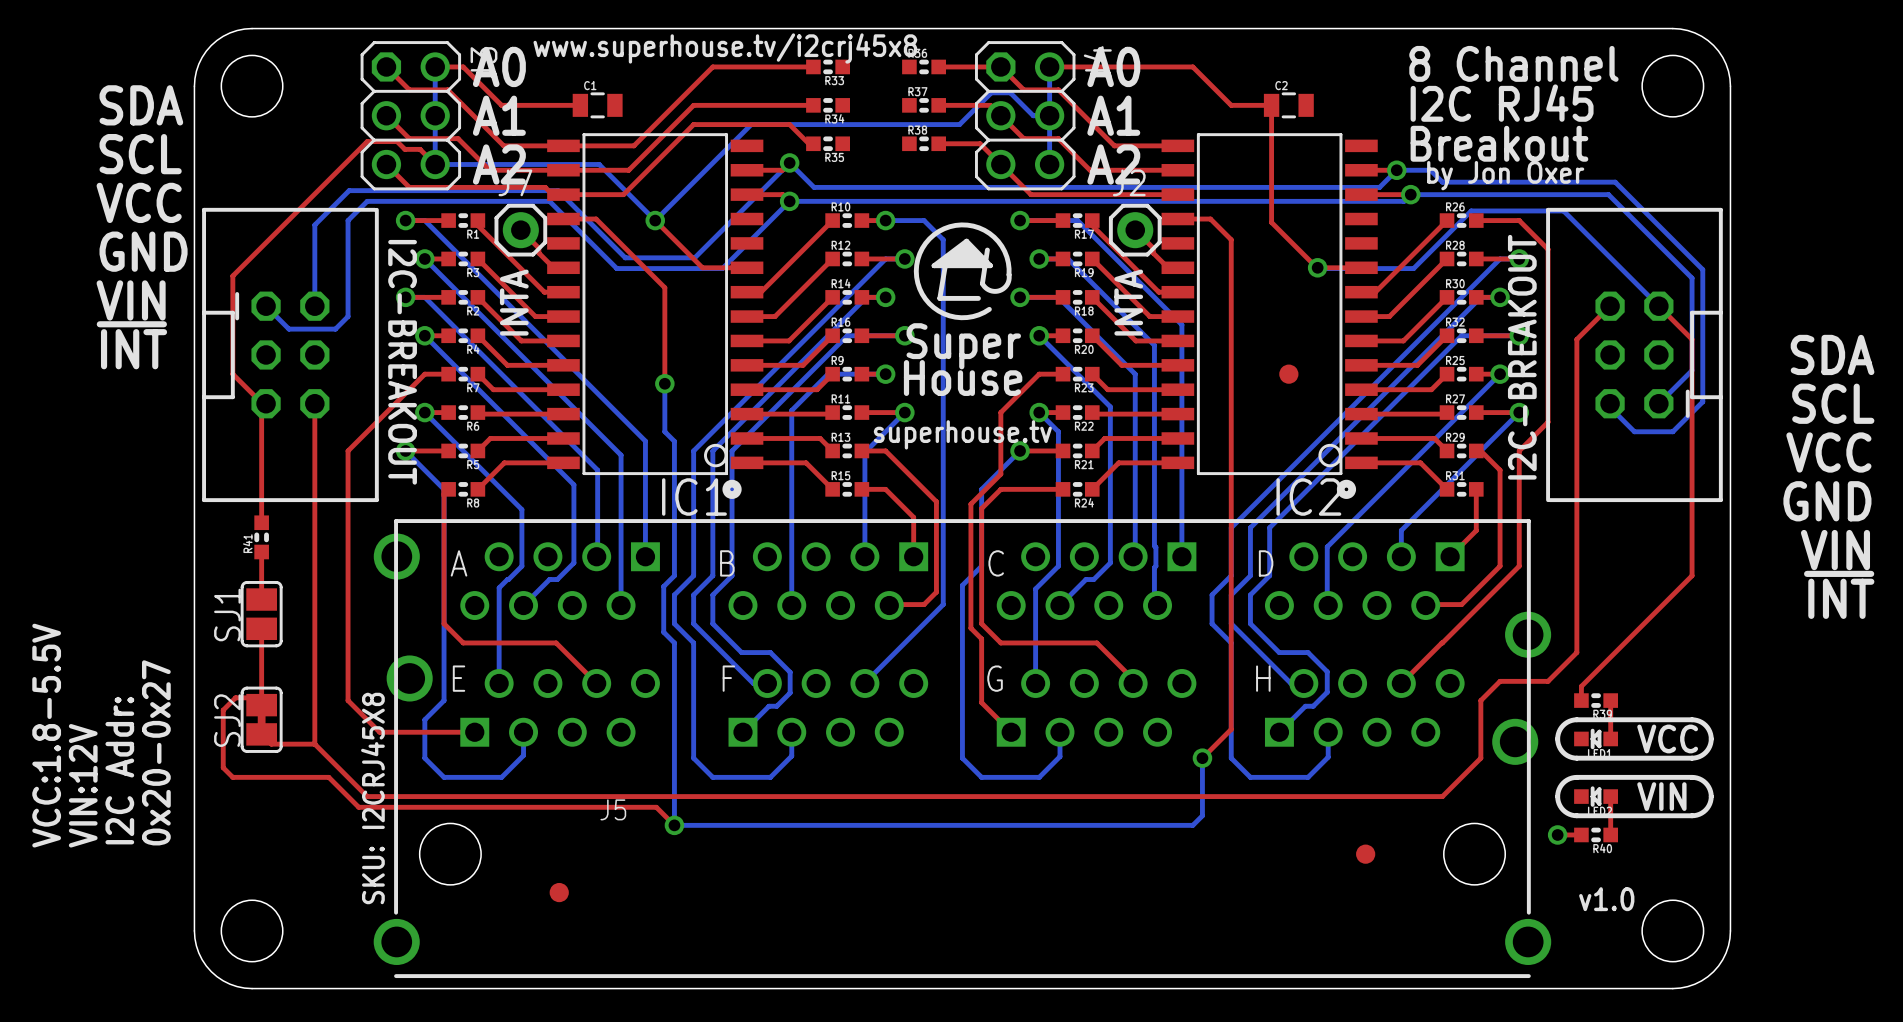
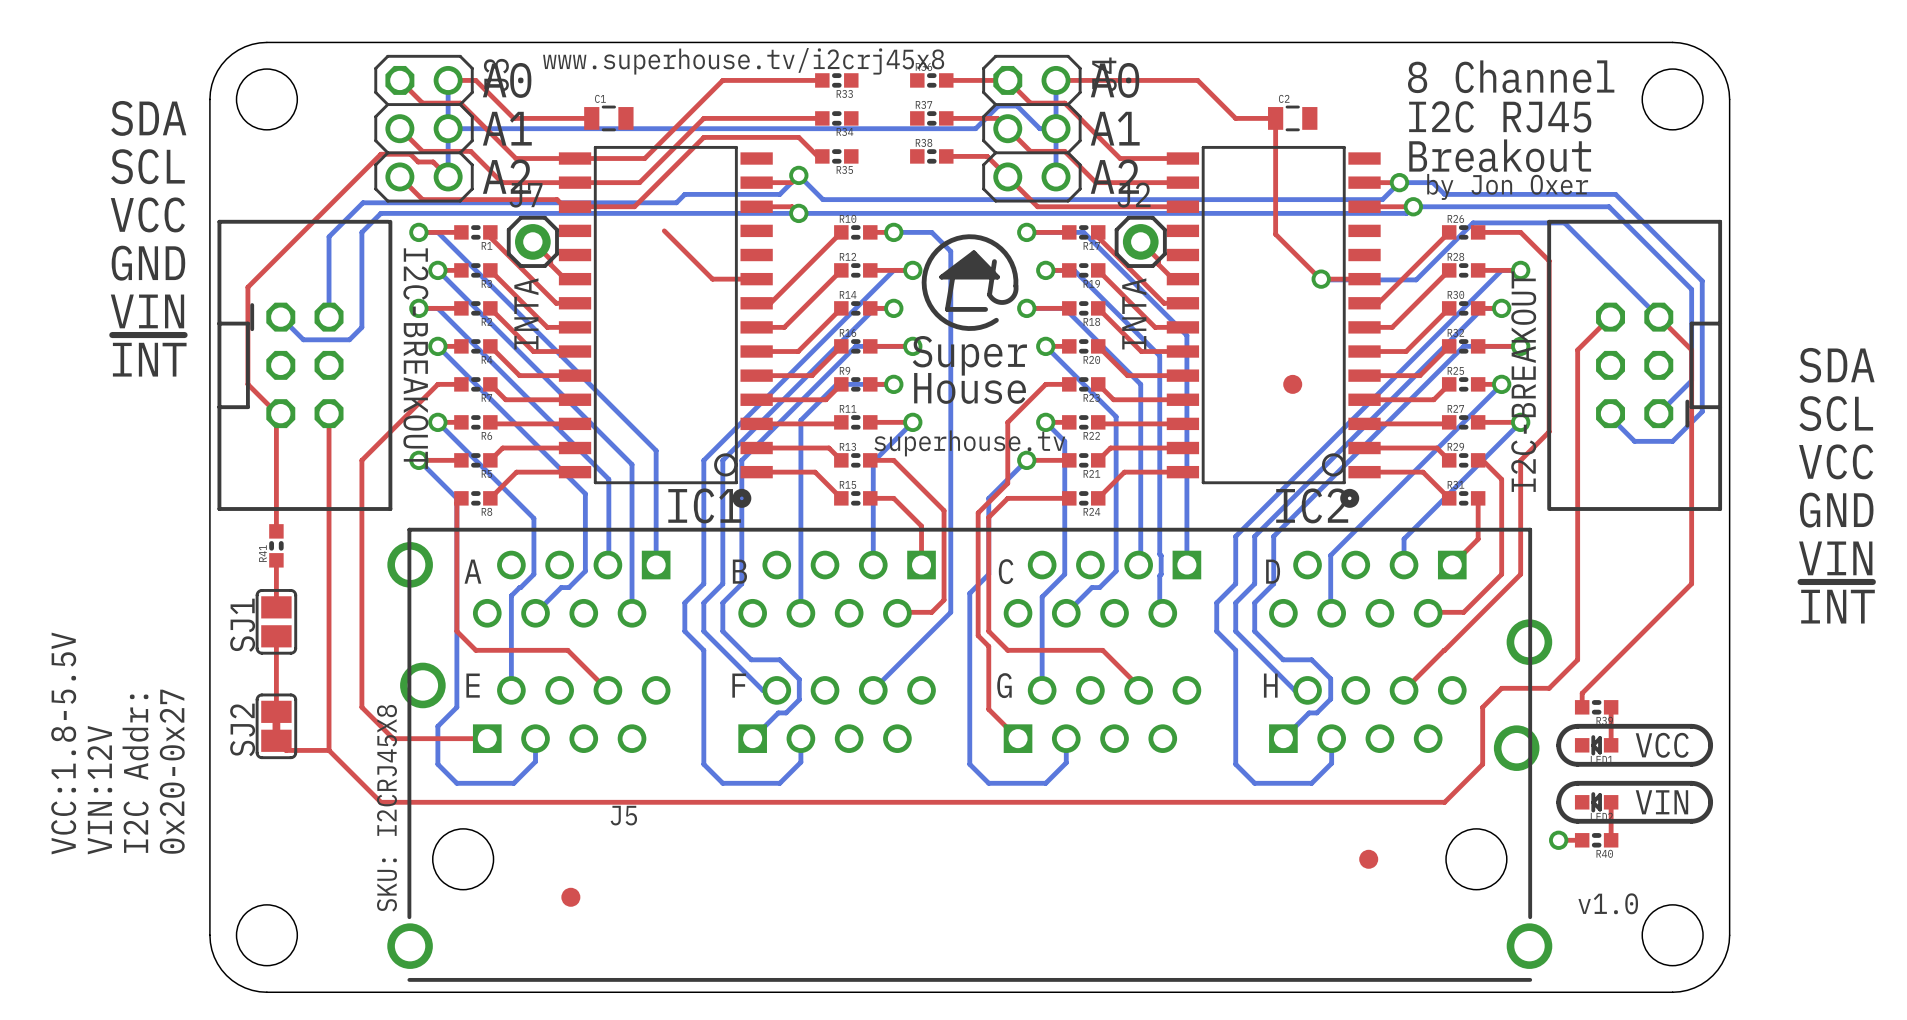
bottom track: (968, 115) (959, 124) (751, 124) (655, 220) (599, 164) (435, 164) -> (975, 128) (448, 128)
bottom track: (770, 182) (694, 257) (625, 257) (558, 190) -> (779, 194) (684, 194) (676, 202) (569, 202)
bottom track: (549, 201) (616, 268) (722, 268) (789, 201) -> (561, 213) (798, 213)
top track: (563, 219) (596, 219) (664, 287) (664, 383) -> none
top track: (1177, 219) (1210, 219) (1231, 239) (1231, 729) (1202, 758) -> none
via: (655, 220) -> none
bottom track: (664, 383) (664, 431) (674, 441) (674, 575) (663, 586) (663, 632) (674, 642) (674, 825) (1192, 825) (1202, 815) (1202, 758) -> none
via: (664, 383) -> none
top track: (261, 697) (235, 697) (223, 710) (223, 767) (232, 777) (328, 777) (358, 807) (656, 807) (674, 825) -> none
via: (1202, 758) -> none
via: (674, 825) -> none

